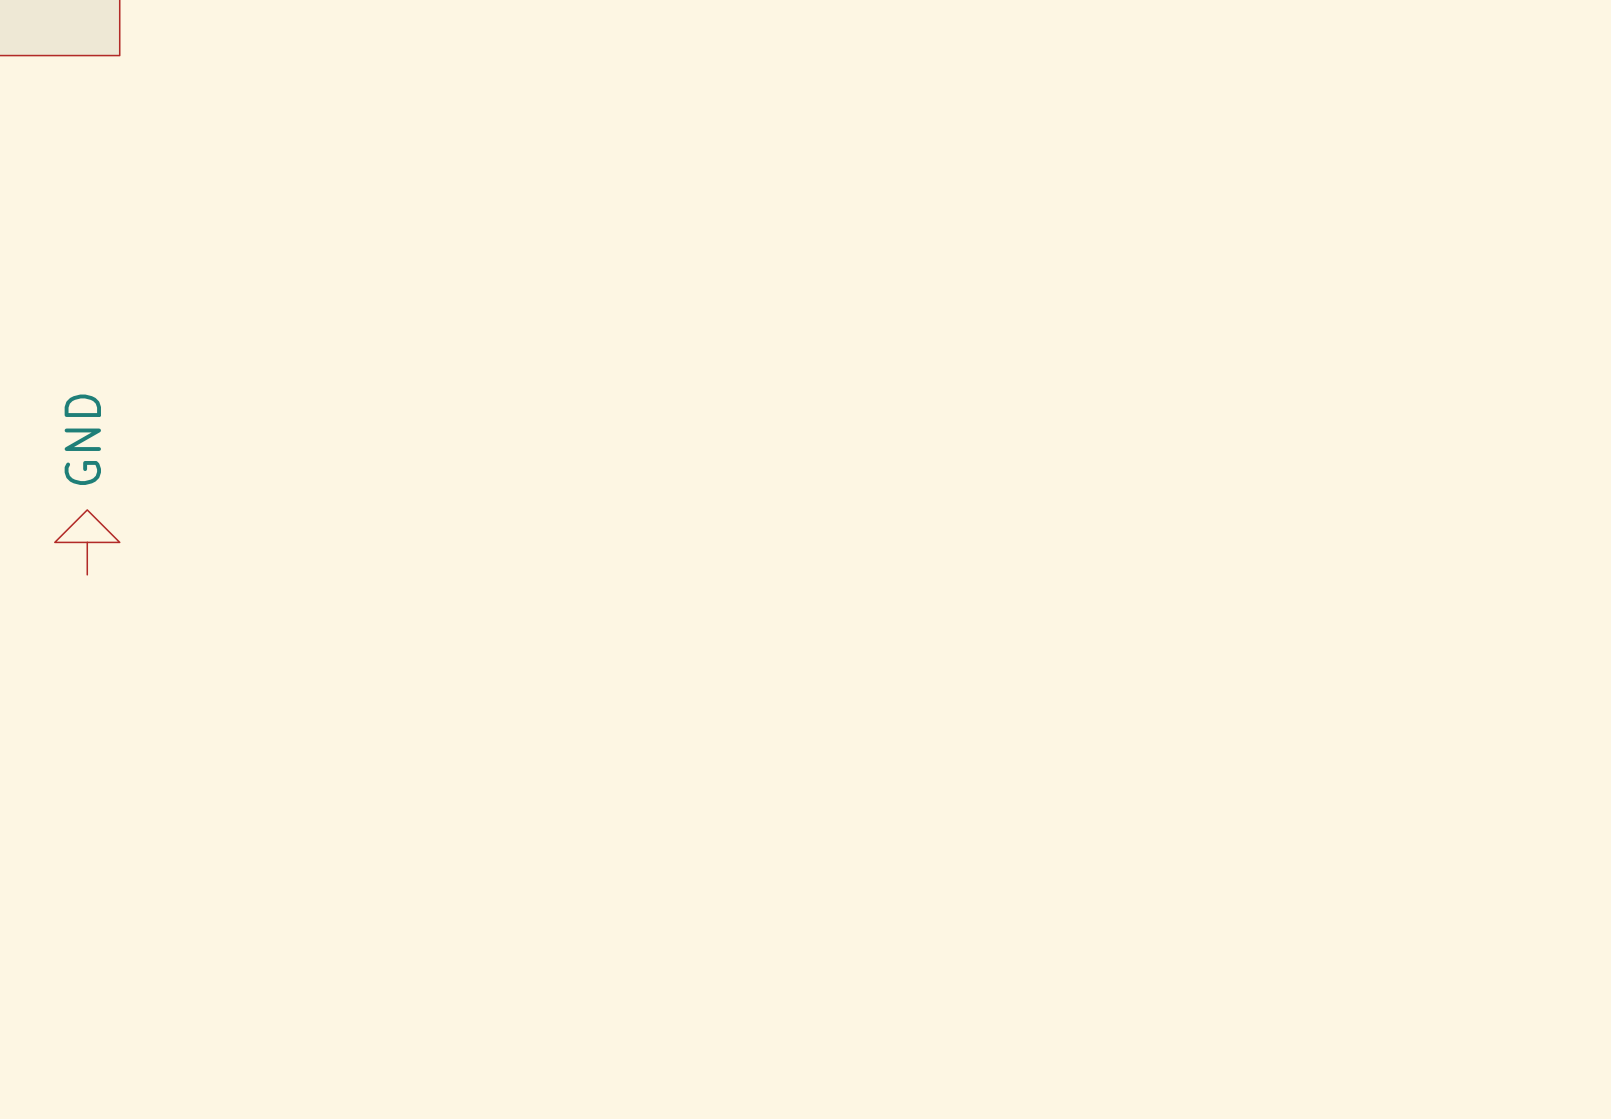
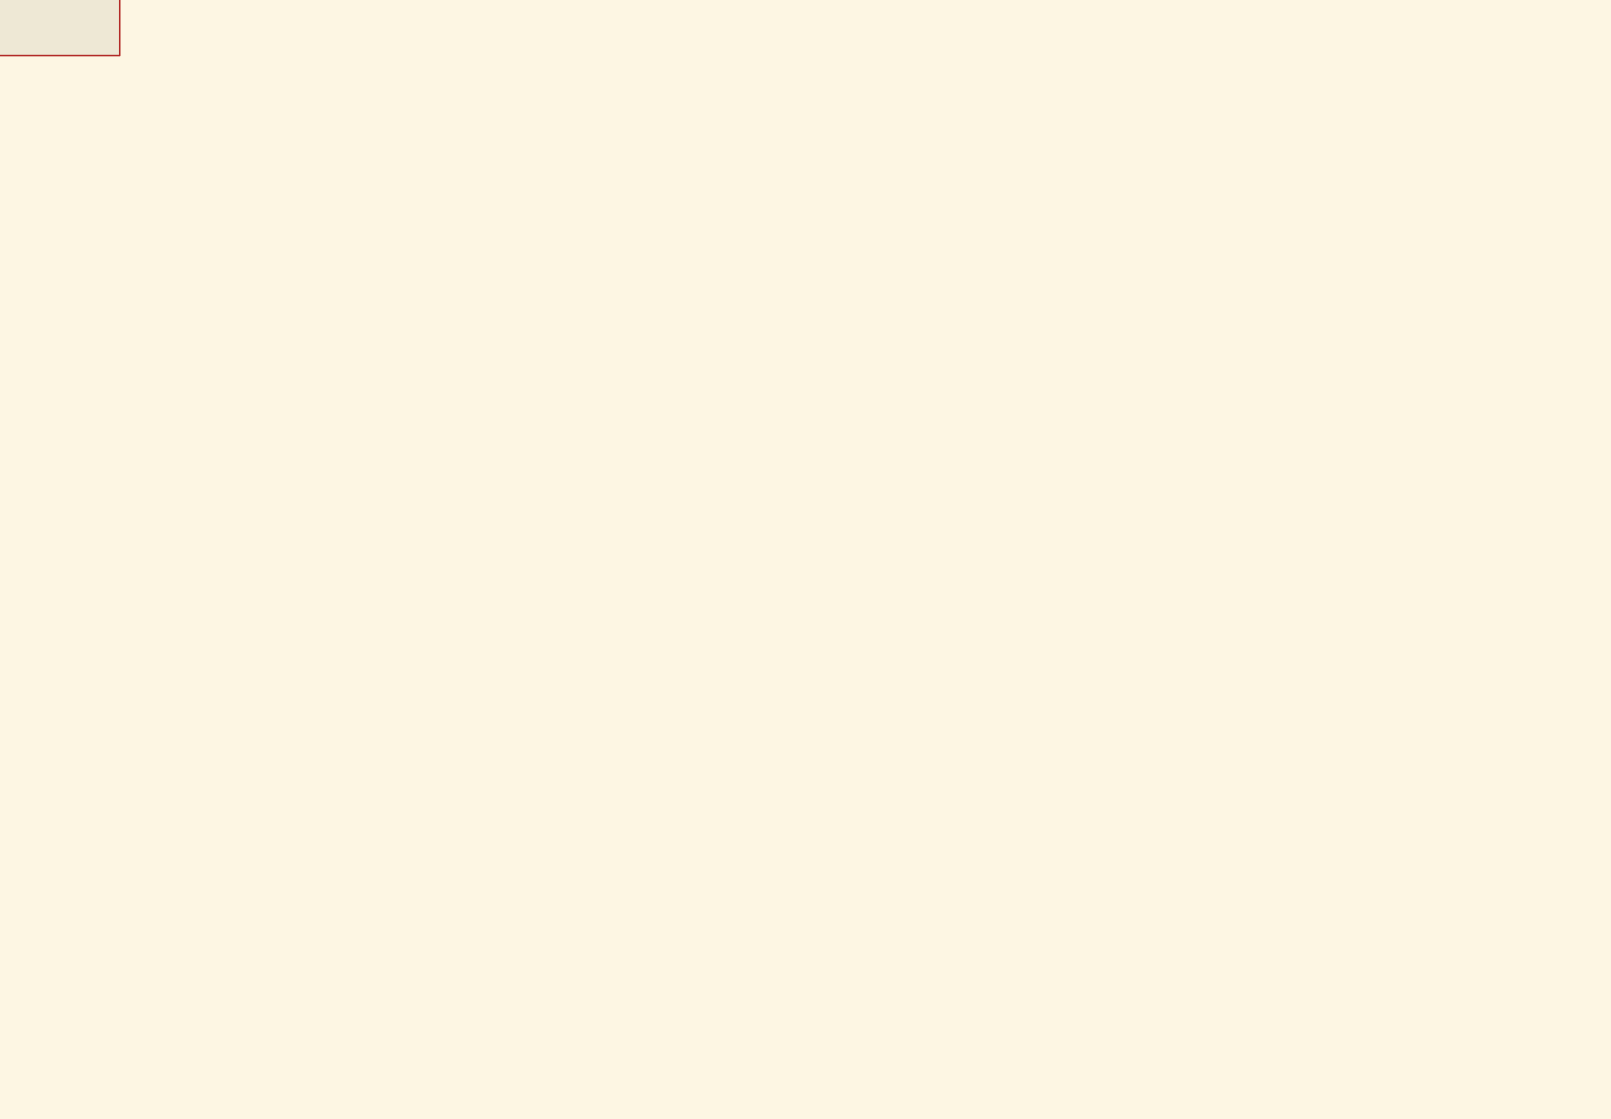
power symbol: GND (87, 542) -> none

